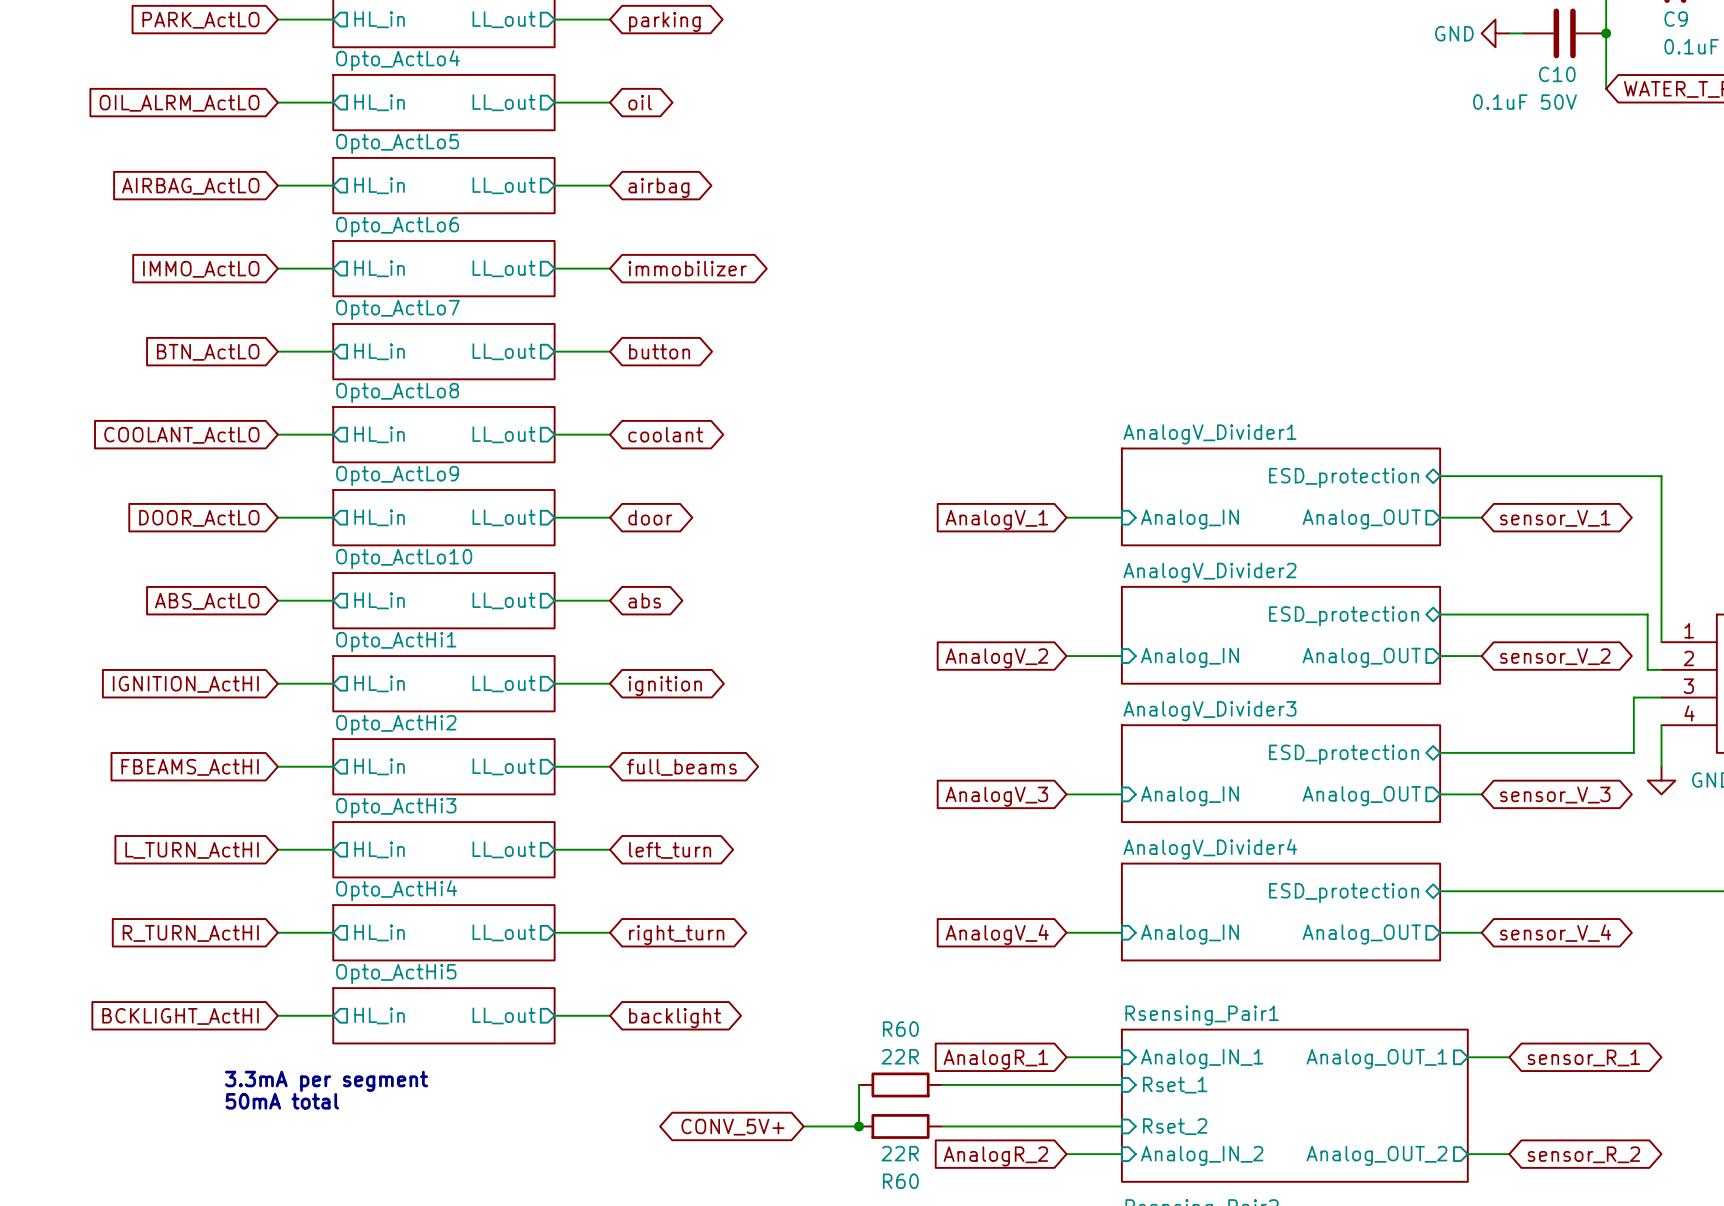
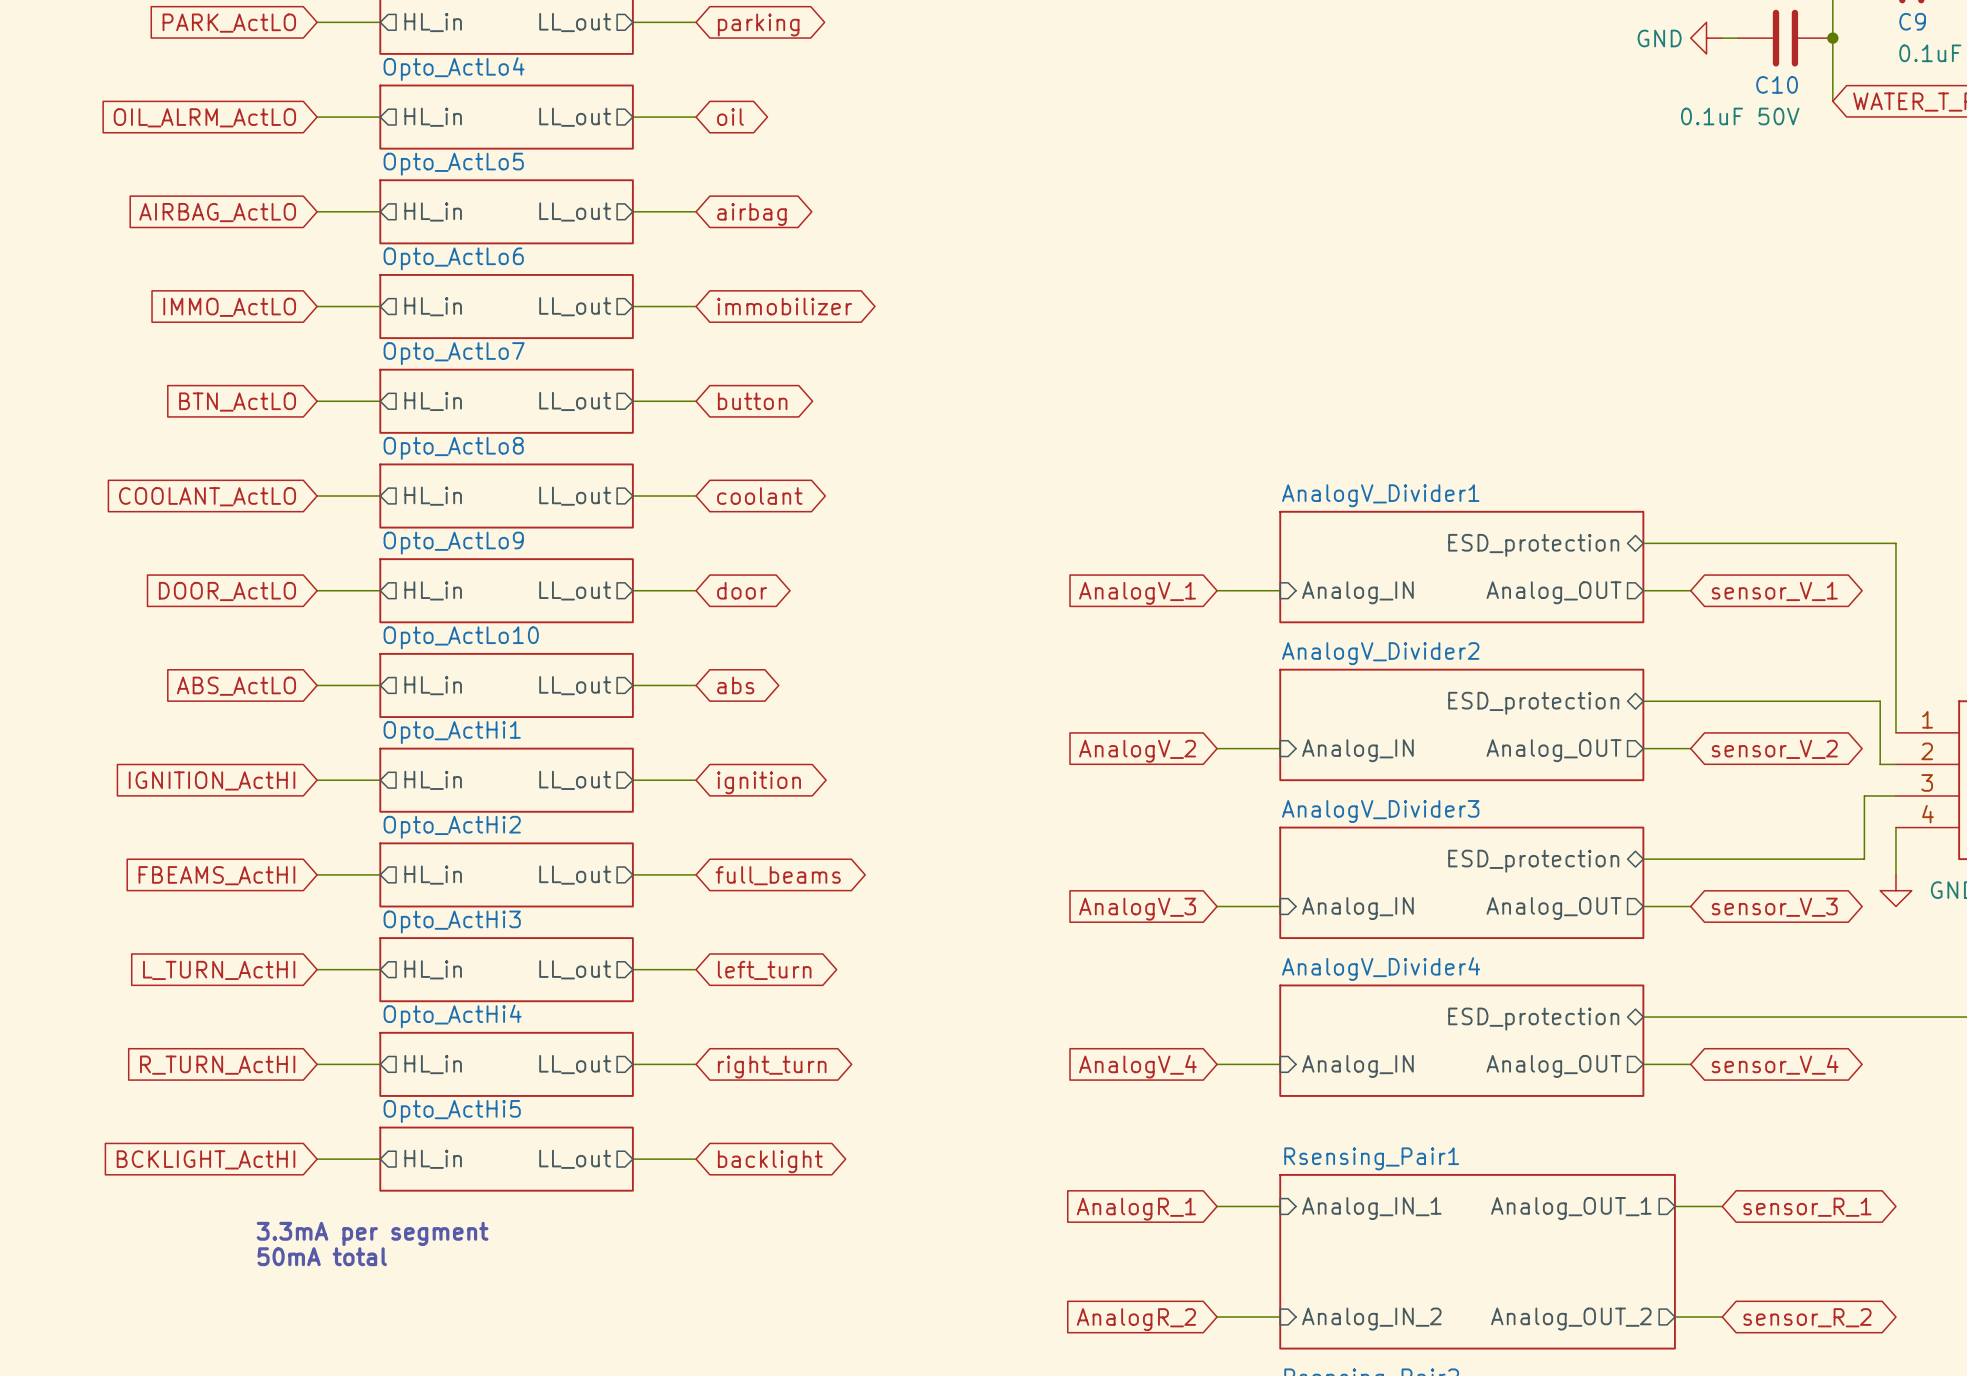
wire: (859, 1084) (859, 1126) (803, 1126) -> none
R60: 22R (900, 1084) -> none
wire: (942, 1084) (1121, 1084) -> none
sheet pin: Rset_1 (1175, 1085) -> none
junction: (859, 1126) -> none
R60: 22R (900, 1126) -> none
wire: (942, 1126) (1121, 1126) -> none
sheet pin: Rset_2 (1175, 1126) -> none
global label: CONV_5V+ (732, 1127) -> none

